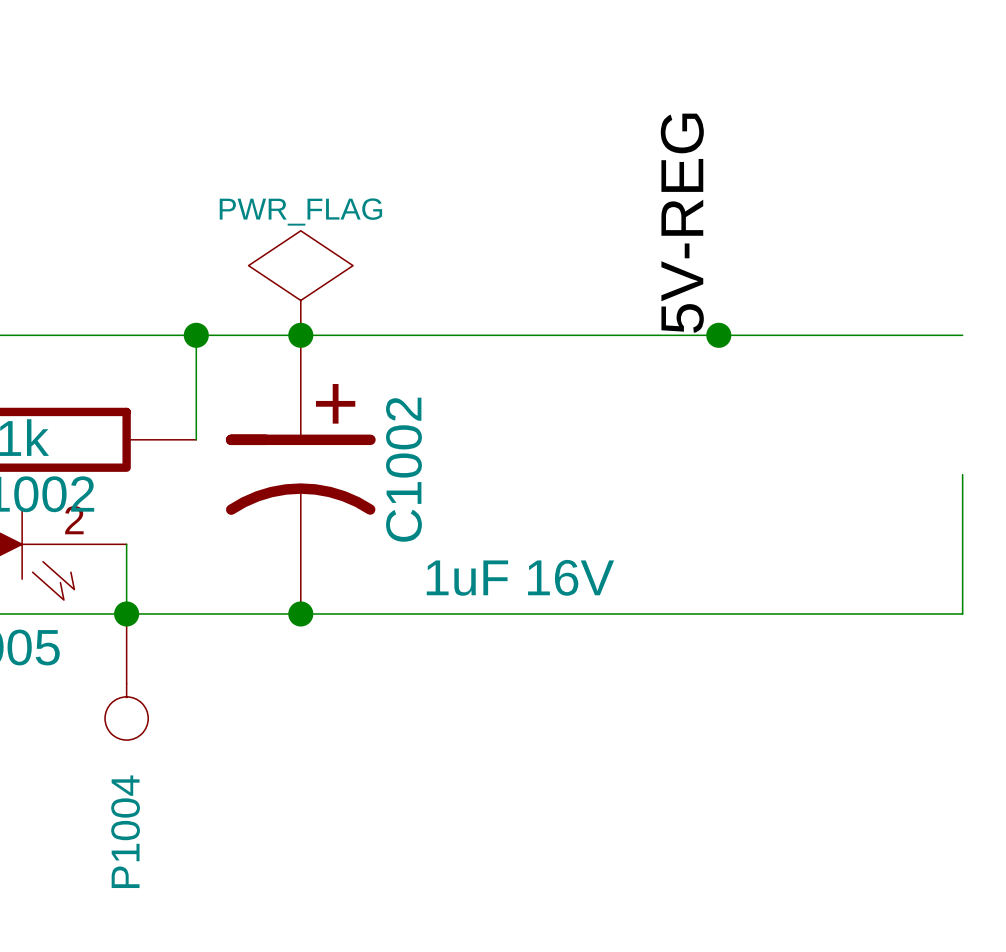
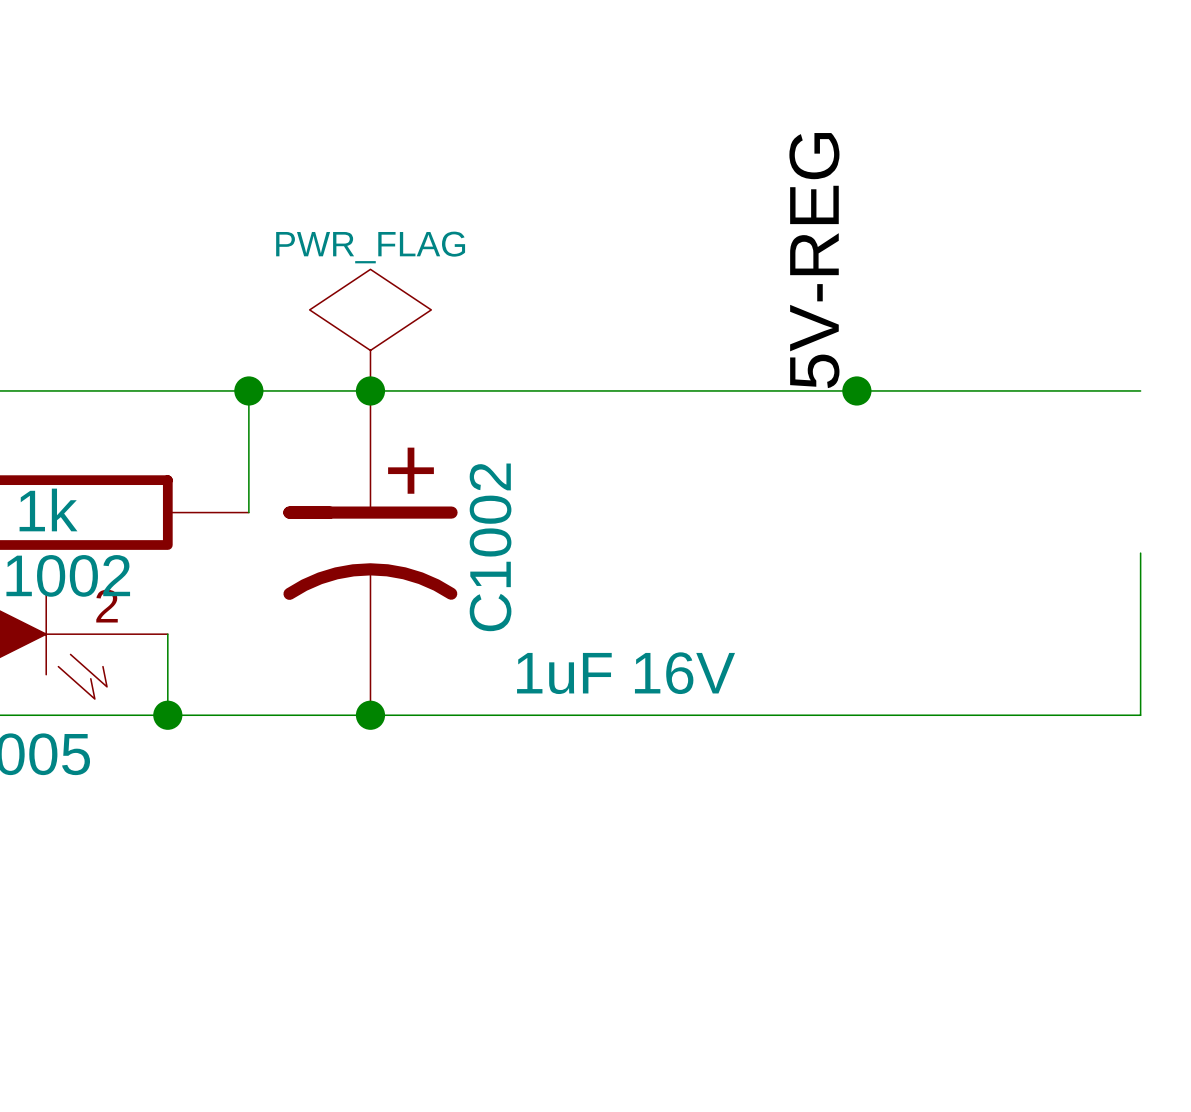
P1004: (126, 677) -> none

